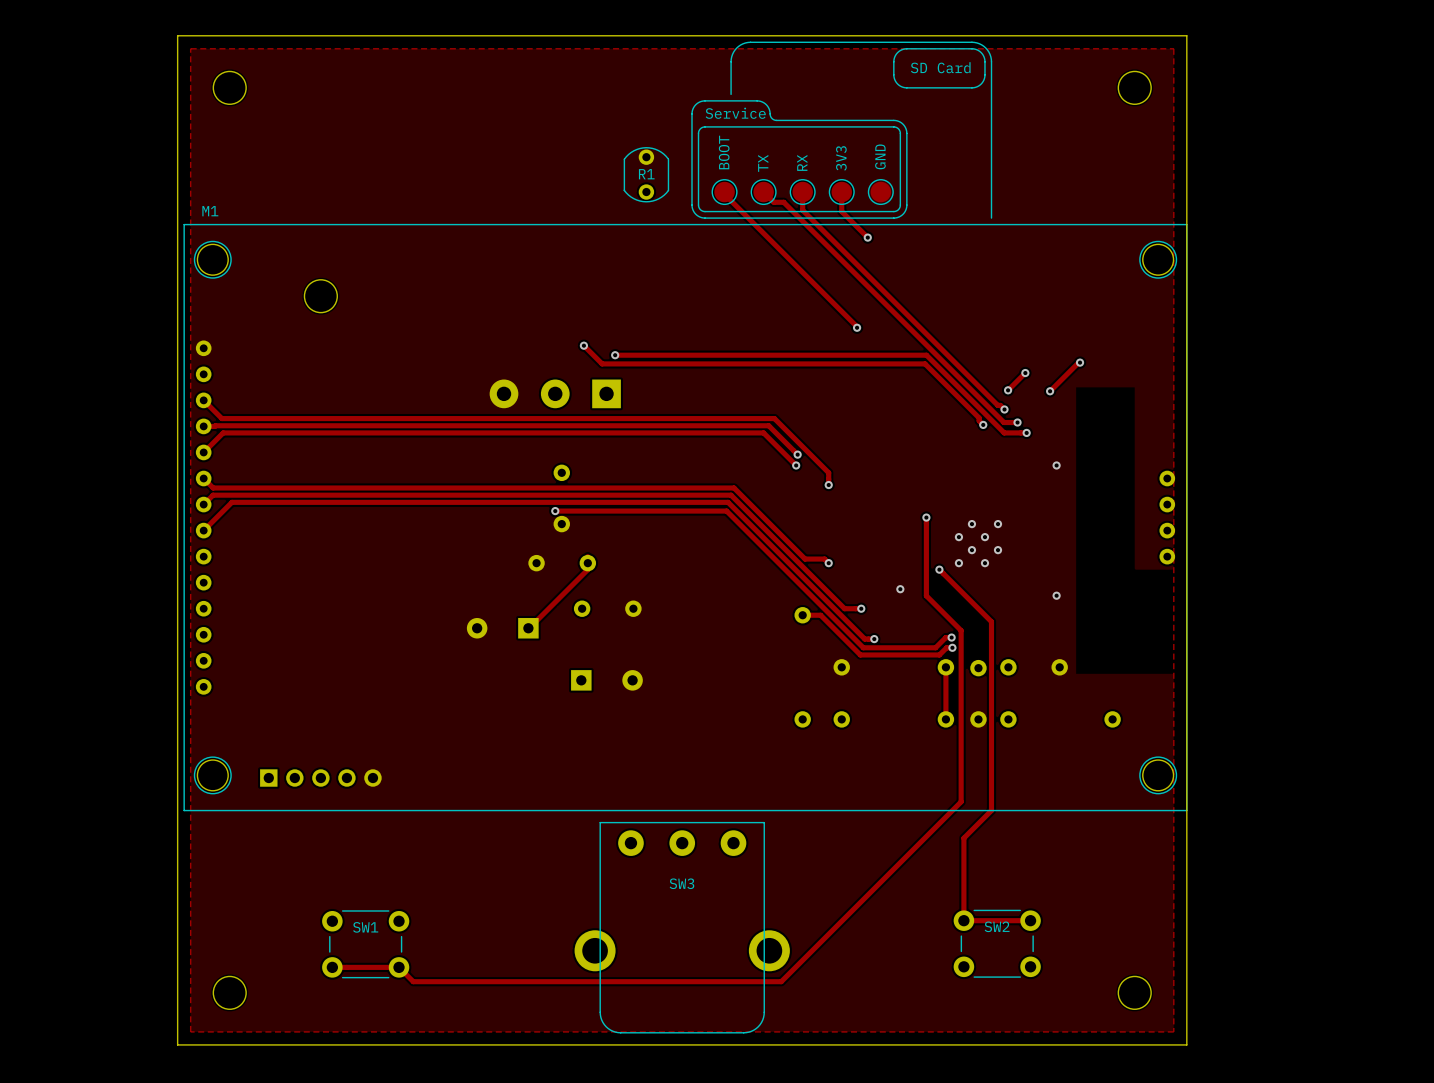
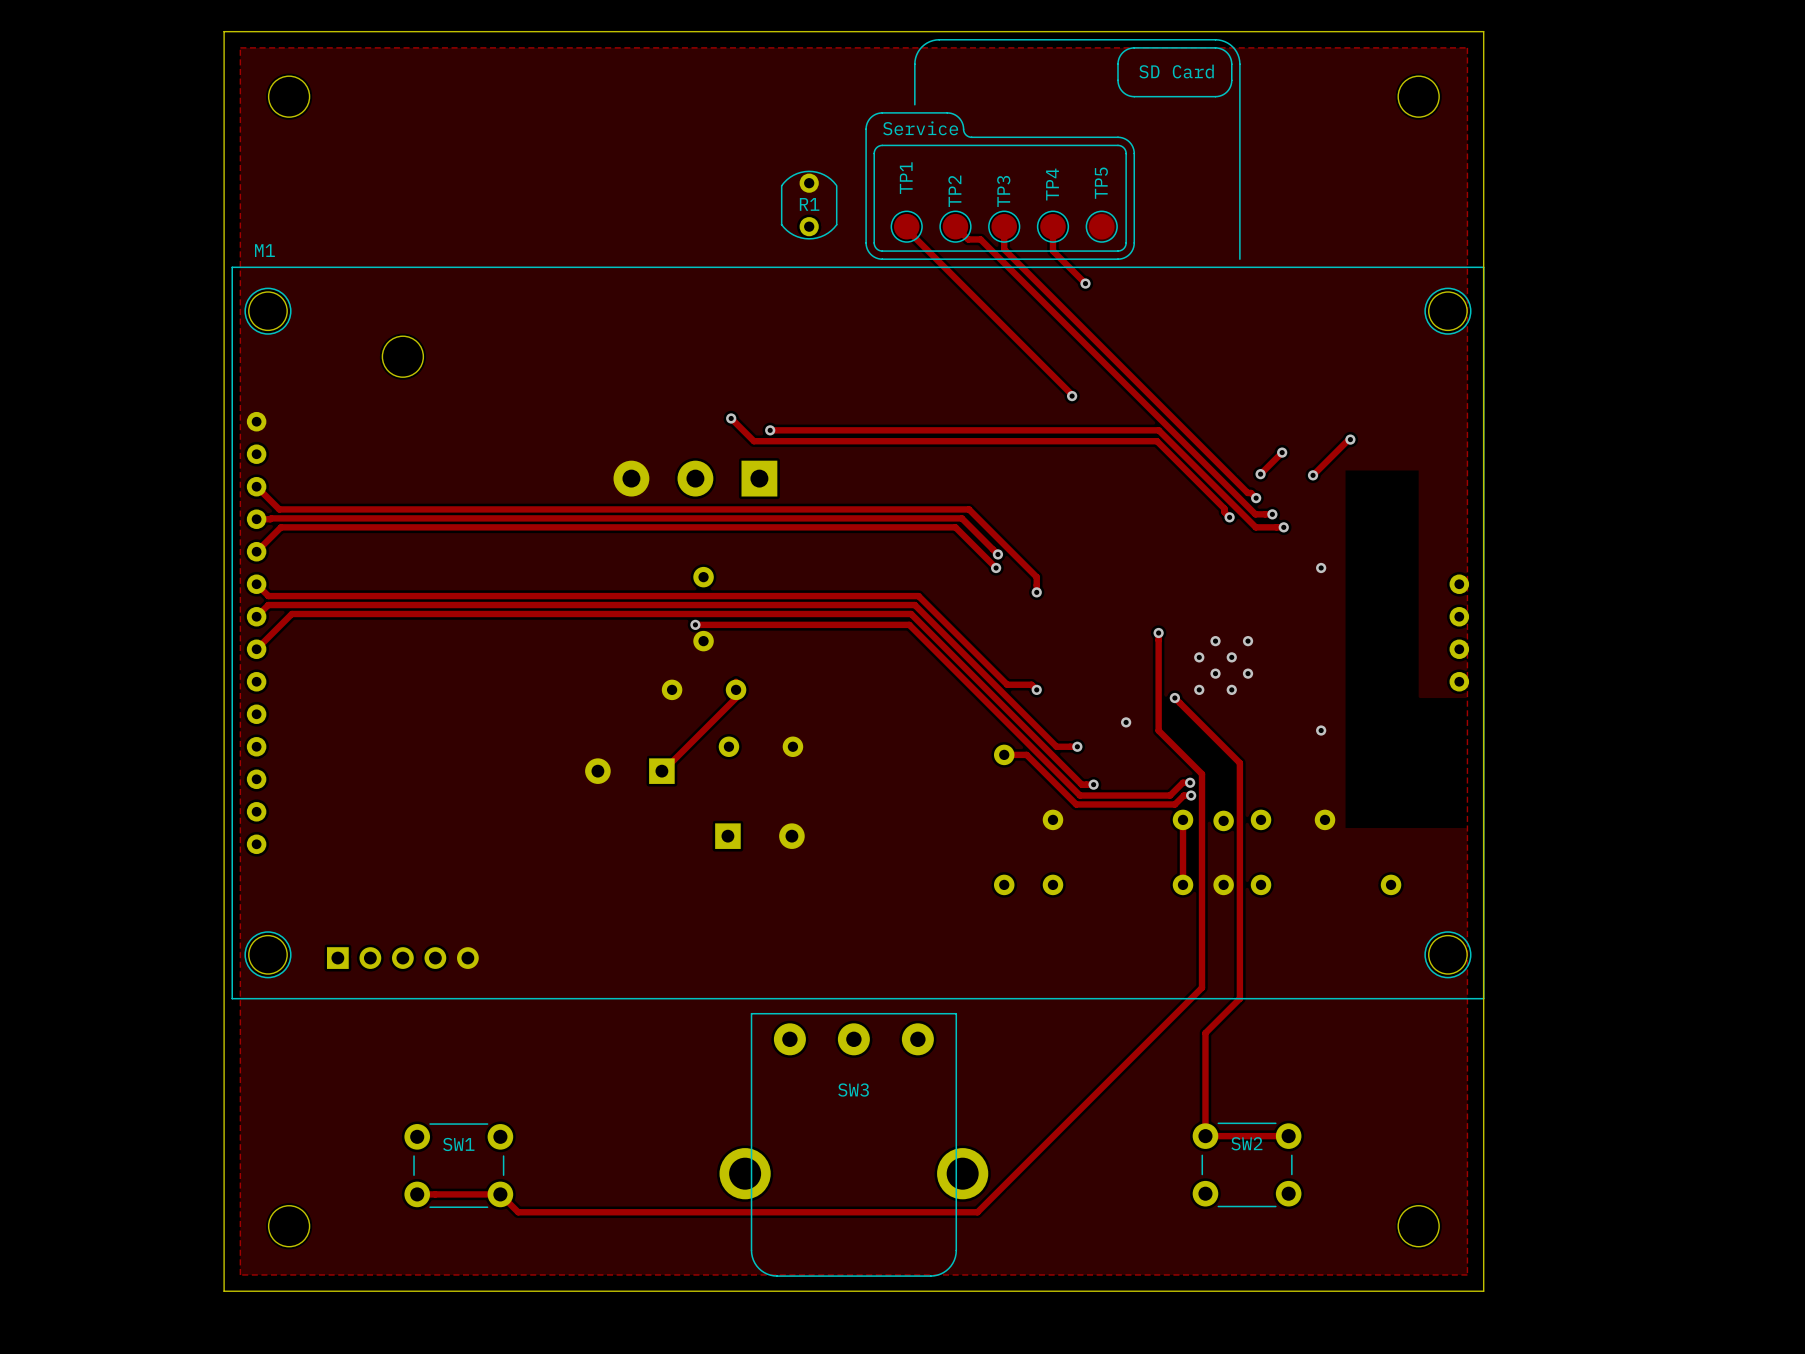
BOOT name: BOOT (724, 152) -> TP1 (906, 178)
GND name: GND (880, 156) -> TP5 (1101, 183)
3V3 name: 3V3 (841, 158) -> TP4 (1052, 184)
RX name: RX (802, 162) -> TP3 (1003, 191)
TX name: TX (763, 163) -> TP2 (954, 191)

